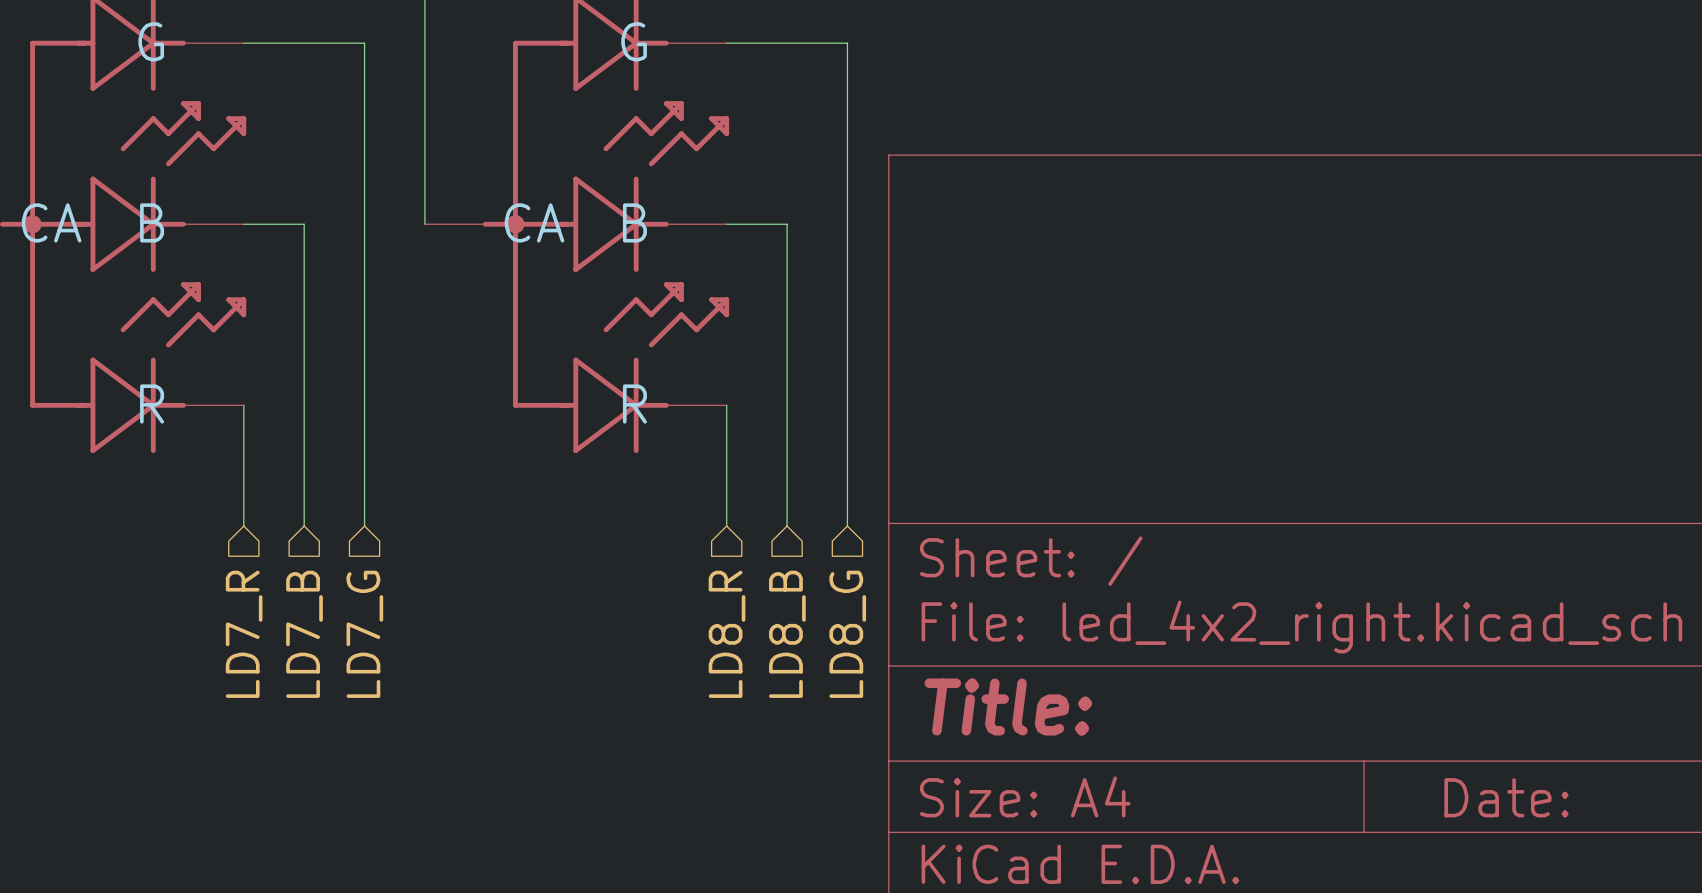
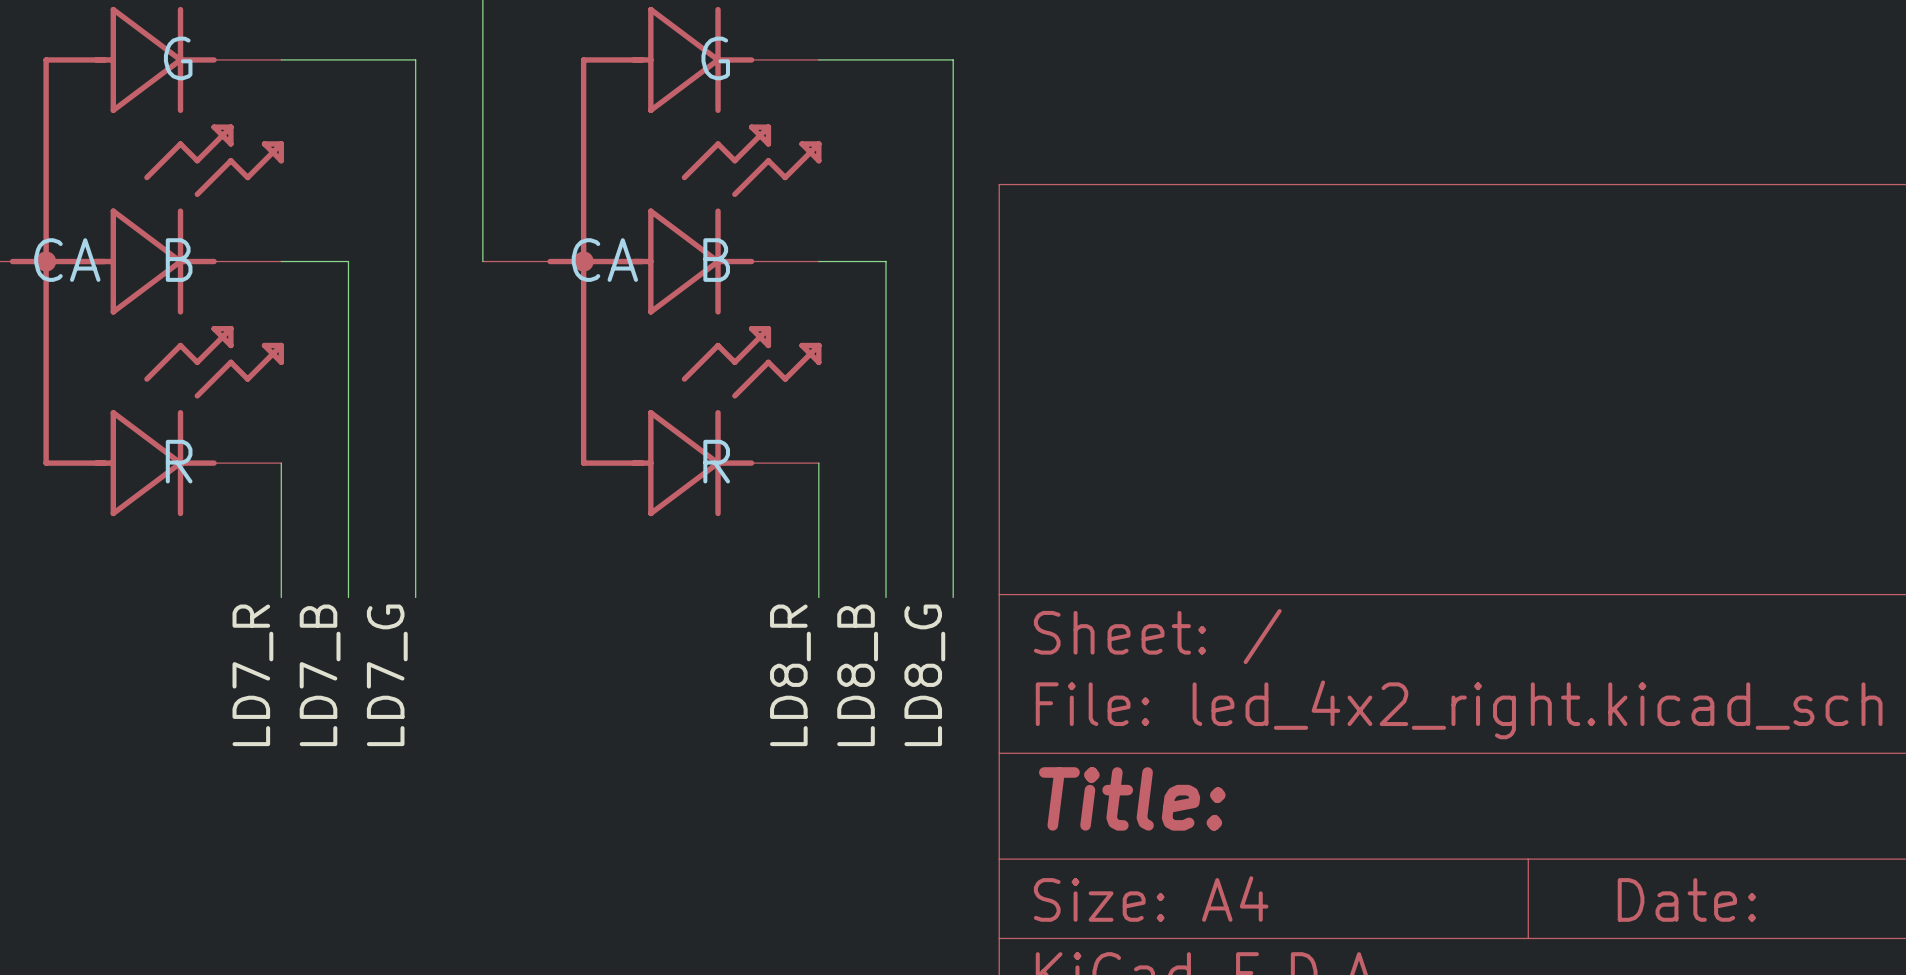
label: none -> LD7_R (252, 675)
label: none -> LD7_B (320, 675)
label: none -> LD7_G (387, 675)
label: none -> LD8_R (790, 675)
label: none -> LD8_B (857, 675)
label: none -> LD8_G (924, 675)
hierarchical label: LD7_R (244, 634) -> none
hierarchical label: LD7_B (304, 634) -> none
hierarchical label: LD7_G (364, 634) -> none
hierarchical label: LD8_R (727, 634) -> none
hierarchical label: LD8_B (787, 634) -> none
hierarchical label: LD8_G (847, 634) -> none

